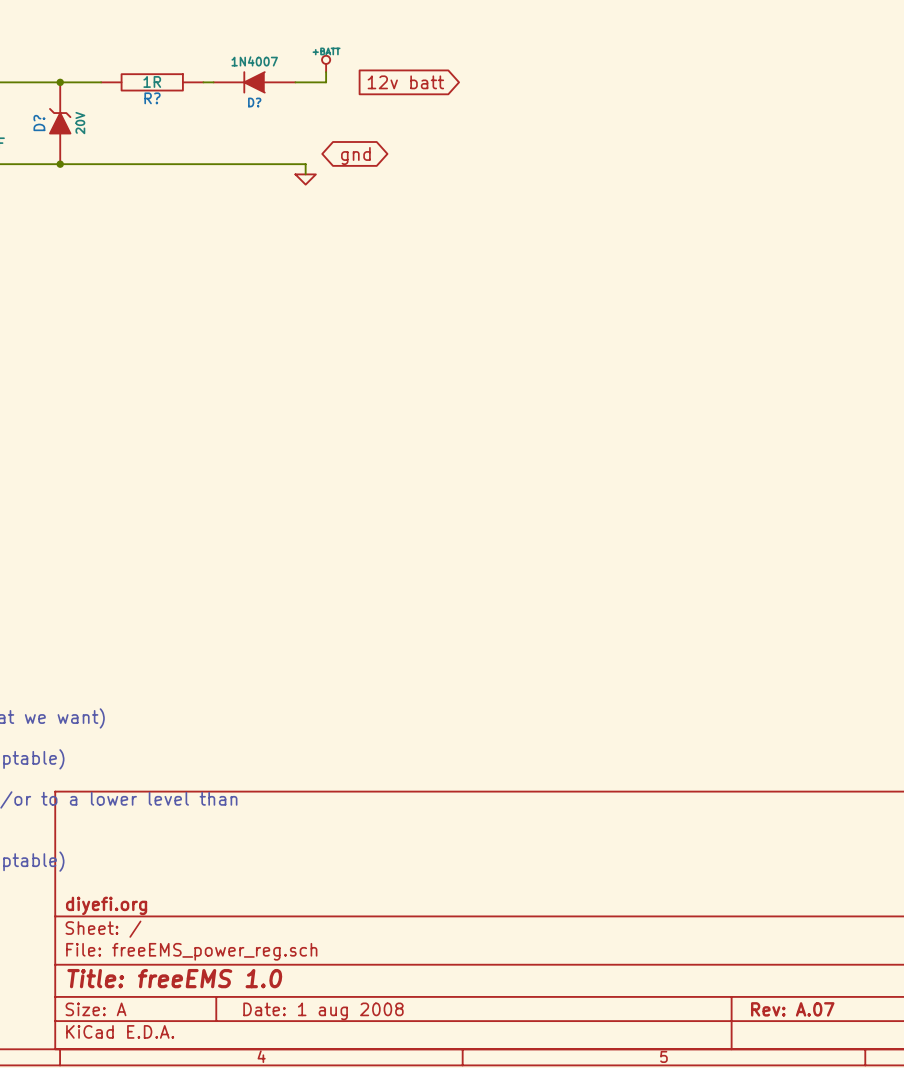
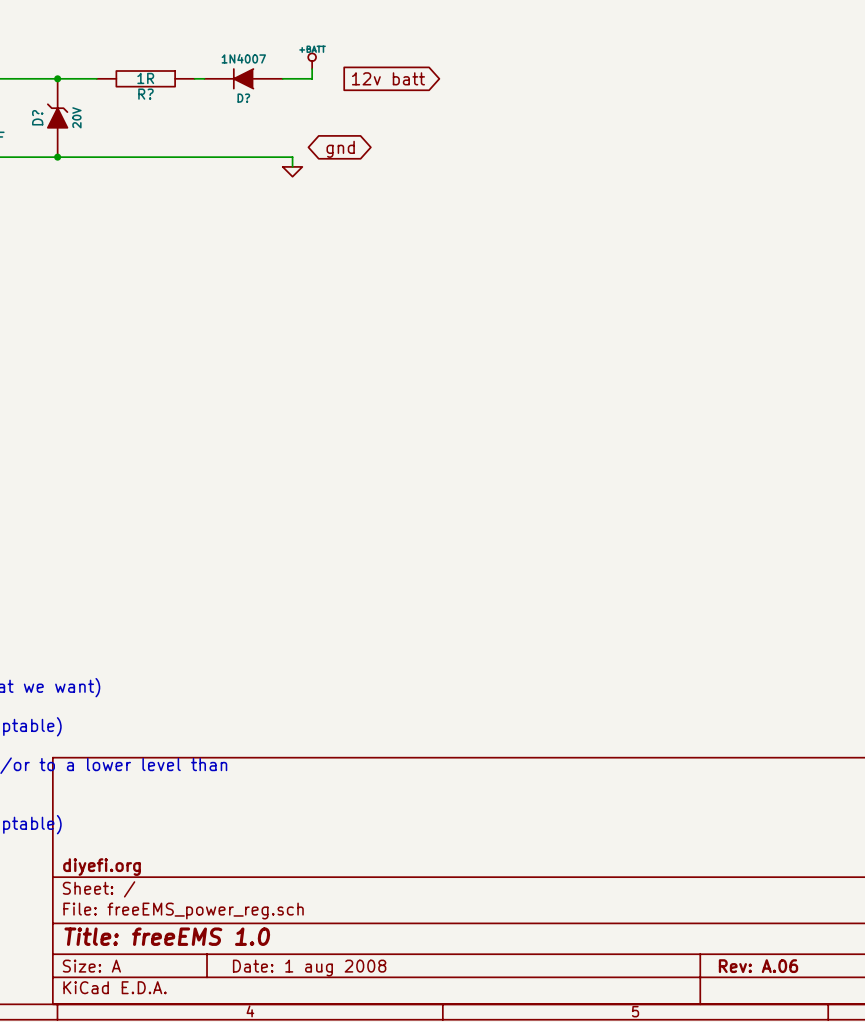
title block: Rev: A.07 (792, 1009) -> Rev: A.06 (758, 966)

